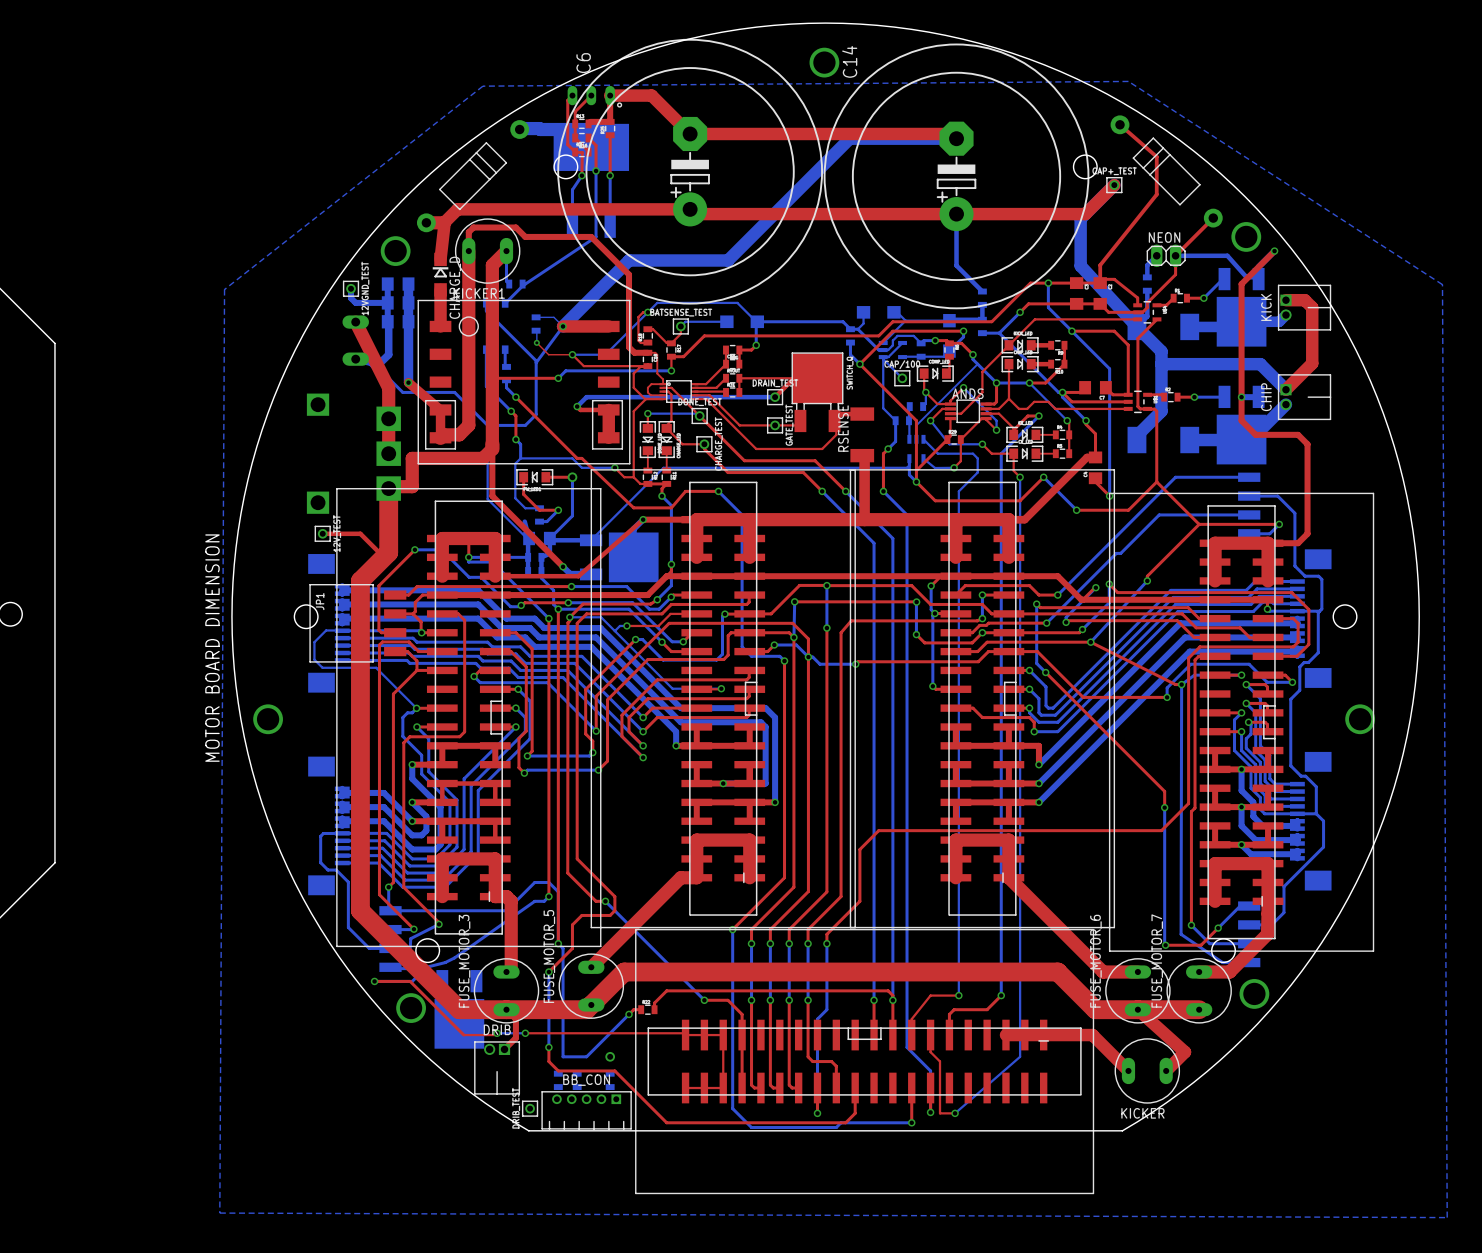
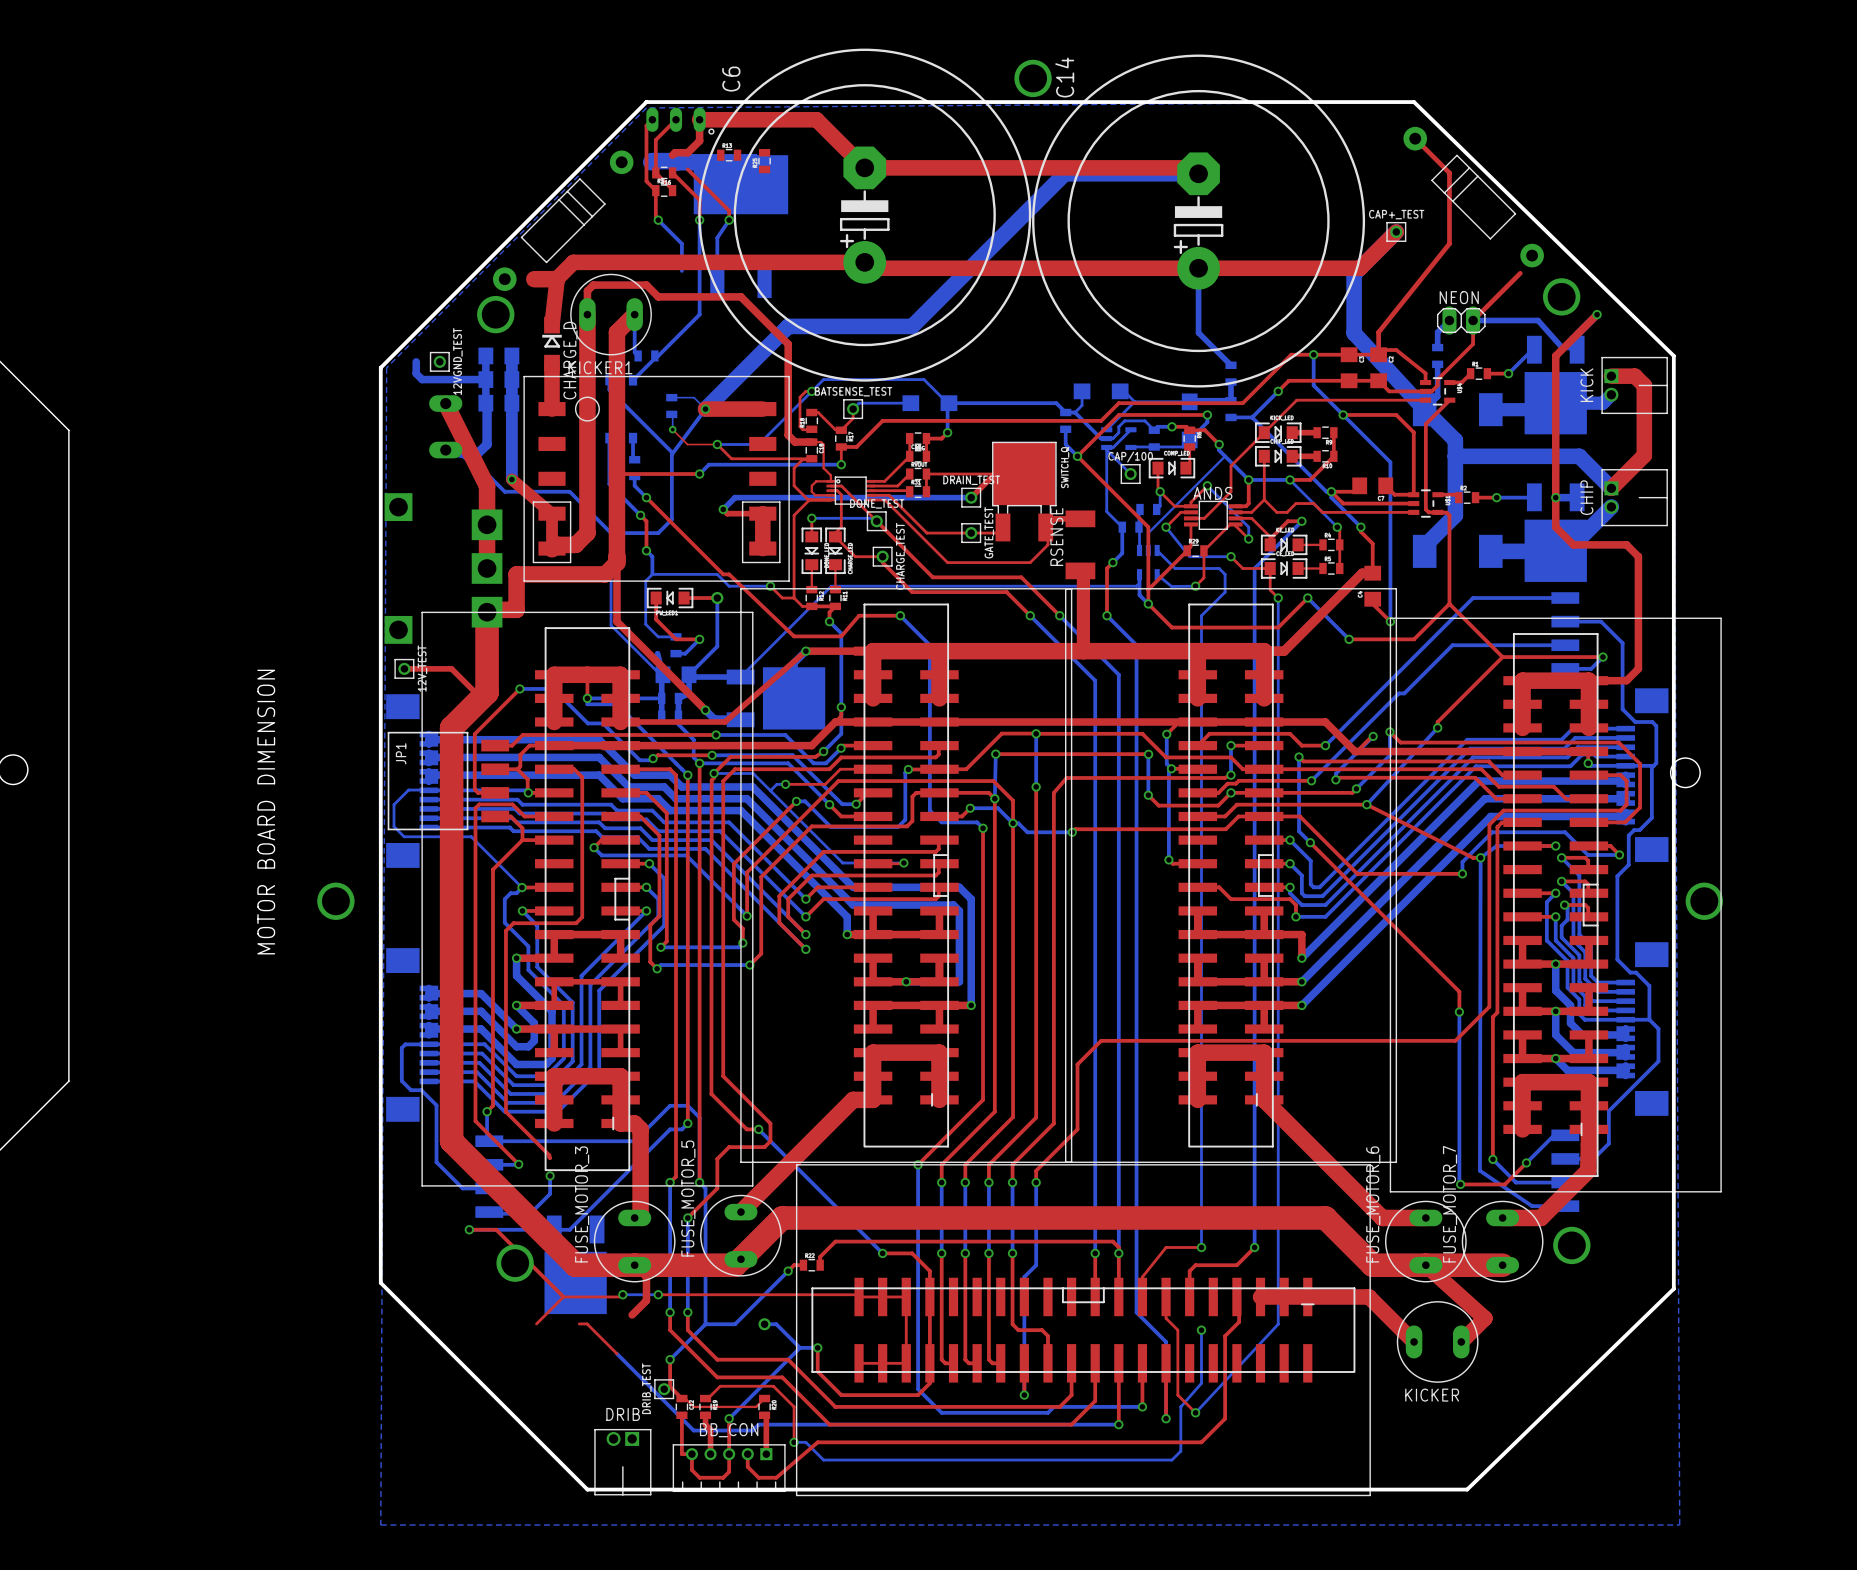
bottom zone outline: (1128, 81) (1442, 284) (1447, 1217) (219, 1213) (224, 289) (482, 86) (1128, 81) -> (1414, 102) (646, 107) (386, 367) (380, 1525) (1679, 1525) (1673, 355) (1414, 102)
top track: none -> (652, 119) (646, 125) (646, 181) (655, 190) (655, 217) (658, 220)
top track: (572, 95) (567, 100) (567, 144) (575, 152) (582, 152) (581, 175) -> (687, 169) (729, 210) (729, 220)
top track: (591, 95) (575, 111) (575, 137) (588, 152) -> (676, 119) (655, 139) (655, 172) (672, 190)
top track: (610, 95) (610, 121) (590, 121) (588, 123) -> (764, 119) (699, 119) (699, 140) (687, 152) (675, 152) (672, 155)
part position: (594, 96) -> (680, 121)
top track: (1120, 124) (1156, 156) -> (1415, 138) (1449, 172) (1449, 196)
top track: (610, 135) (610, 175) -> none
top track: none -> (672, 172) (699, 199) (699, 220)
part position: (581, 137) -> (664, 172)
top track: (588, 137) (596, 145) (596, 170) -> none
part position: (581, 152) -> (664, 190)
round board edge: [554, 155, 578, 179] -> none
round board edge: [1073, 155, 1098, 179] -> none
bottom track: (596, 170) (596, 236) (525, 284) -> (699, 220) (699, 314) (658, 355)
via: (596, 170) -> none
part position: (1166, 171) -> (1473, 197)
bottom track: none -> (658, 220) (681, 243) (681, 270)
via: none -> (658, 220)
via: none -> (699, 220)
bottom track: (610, 175) (610, 220) -> none
via: (610, 175) -> none
part position: (473, 176) -> (563, 220)
bottom track: (351, 288) (351, 298) (355, 302) -> (416, 361) (416, 373) (422, 379) (445, 379)
round board edge: [294, 604, 318, 629] -> none
top track: none -> (620, 769) (670, 769) (676, 775) (676, 1176) (670, 1182)
bottom track: (534, 901) (454, 957) (426, 967) (412, 981) -> (670, 1129) (569, 1229) (516, 1229)
bottom track: (439, 924) (410, 938) (409, 968) -> (550, 1175) (550, 1193) (530, 1213) (512, 1213)
via position: (439, 924) -> (550, 1175)
round board edge: [415, 938, 440, 963] -> none
round board edge: [1211, 938, 1236, 963] -> none
bottom track: none -> (670, 1182) (670, 1312)
via: none -> (670, 1182)
top track: (396, 981) (410, 981) (463, 1035) -> (496, 1229) (563, 1296)
top track: none -> (563, 1296) (536, 1323)
top track: none -> (563, 1296) (581, 1296)
top track: none -> (1236, 1296) (1239, 1294) (1239, 1322) (1225, 1336) (1225, 1418) (1201, 1442) (817, 1442) (776, 1477) (758, 1477) (747, 1466) (747, 1454)
top track: none -> (670, 1312) (670, 1330) (717, 1377) (782, 1377) (829, 1424) (1071, 1424) (1095, 1401) (1095, 1363)
via: none -> (670, 1312)
top track: none -> (579, 1323) (587, 1323) (616, 1353)
bottom track: none -> (705, 1324) (670, 1359)
bottom track: none -> (764, 1324) (776, 1324) (800, 1347)
bottom track: (1020, 1056) (955, 1113) -> (1278, 1324) (1195, 1412)
bottom track: none -> (1201, 1330) (1201, 1383) (1180, 1406) (1180, 1451) (1171, 1460) (823, 1460) (805, 1442) (794, 1442)
via: none -> (1201, 1330)
DRIB position: (497, 1067) -> (622, 1462)
top track: (558, 1070) (614, 1070) (629, 1085) -> (699, 1341) (717, 1359) (788, 1359)
bottom track: none -> (800, 1347) (729, 1418)
bottom track: none -> (800, 1347) (817, 1347)
top track: none -> (817, 1347) (817, 1371) (841, 1395) (918, 1395) (929, 1383) (929, 1363)
via: none -> (817, 1347)
bottom track: none -> (616, 1353) (693, 1430) (752, 1430) (758, 1424) (1118, 1424)
part side: bottom (558, 1080) -> top (681, 1406)
part side: bottom (577, 1080) -> top (705, 1406)
part side: bottom (610, 1080) -> top (764, 1406)
top track: none -> (670, 1359) (670, 1386) (693, 1406) (756, 1406) (764, 1398)
via: none -> (670, 1359)
top track: none -> (1118, 1363) (1118, 1424)
BB_CON position: (586, 1110) -> (729, 1468)
top track: none -> (1166, 1393) (1166, 1418)
via: (930, 1112) -> none
top track: (940, 1113) (955, 1113) -> (1177, 1395) (1195, 1412)
via: (955, 1113) -> none
top track: none -> (705, 1398) (707, 1398) (720, 1386) (773, 1386) (794, 1406) (794, 1442)
via: none -> (1195, 1412)
top track: none -> (681, 1415) (681, 1454) (691, 1454) (691, 1470) (699, 1477) (723, 1477) (729, 1471) (729, 1418)
top track: none -> (705, 1415) (705, 1424) (710, 1429) (710, 1454)
top track: none -> (764, 1415) (766, 1417) (766, 1454)
board edge: (528, 1130) (1122, 1130) (1180, 1092) (1207, 1071) (1245, 1036) (1291, 984) (1311, 957) (1339, 913) (1363, 867) (1383, 819) (1399, 770) (1412, 702) (1418, 651) (1418, 582) (1410, 513) (1399, 463) (1377, 397) (1356, 350) (1330, 305) (1301, 262) (1257, 209) (1220, 173) (1180, 140) (1122, 102) (1076, 78) (1028, 58) (962, 39) (911, 29) (860, 24) (791, 24) (722, 32) (671, 43) (622, 58) (559, 86) (499, 120) (457, 151) (418, 184) (370, 235) (339, 276) (311, 319) (287, 365) (267, 413) (252, 463) (238, 530) (232, 582) (232, 651) (240, 719) (252, 770) (267, 819) (295, 883) (329, 942) (359, 984) (393, 1024) (444, 1071) (485, 1103) (528, 1130) -> (646, 102) (380, 367) (380, 1282) (587, 1489) (1467, 1489) (1673, 1288) (1673, 355) (1414, 102) (646, 102)
via: none -> (729, 1418)
via: none -> (1166, 1418)
via: none -> (1118, 1424)
via: none -> (794, 1442)

